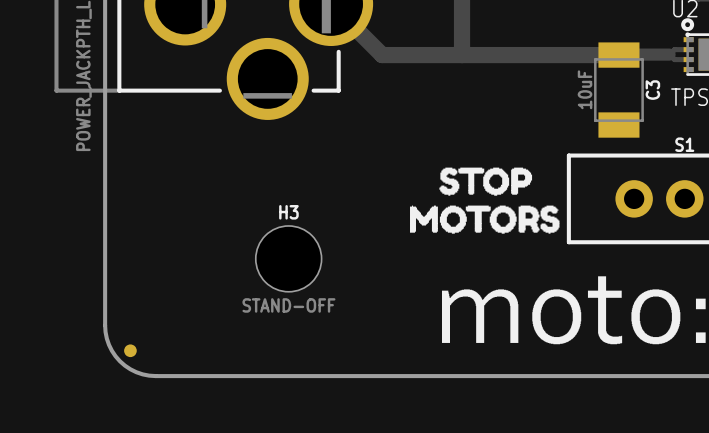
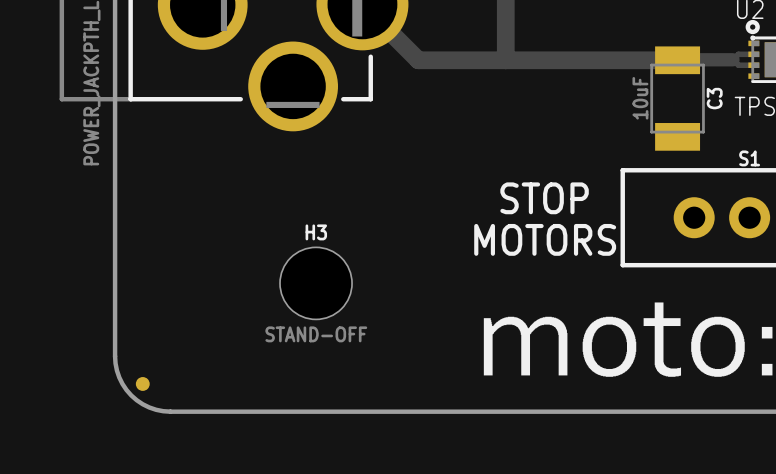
drawing: [410, 167, 560, 234] -> none
text: none -> STOP (544, 198)
text: none -> MOTORS (545, 239)

